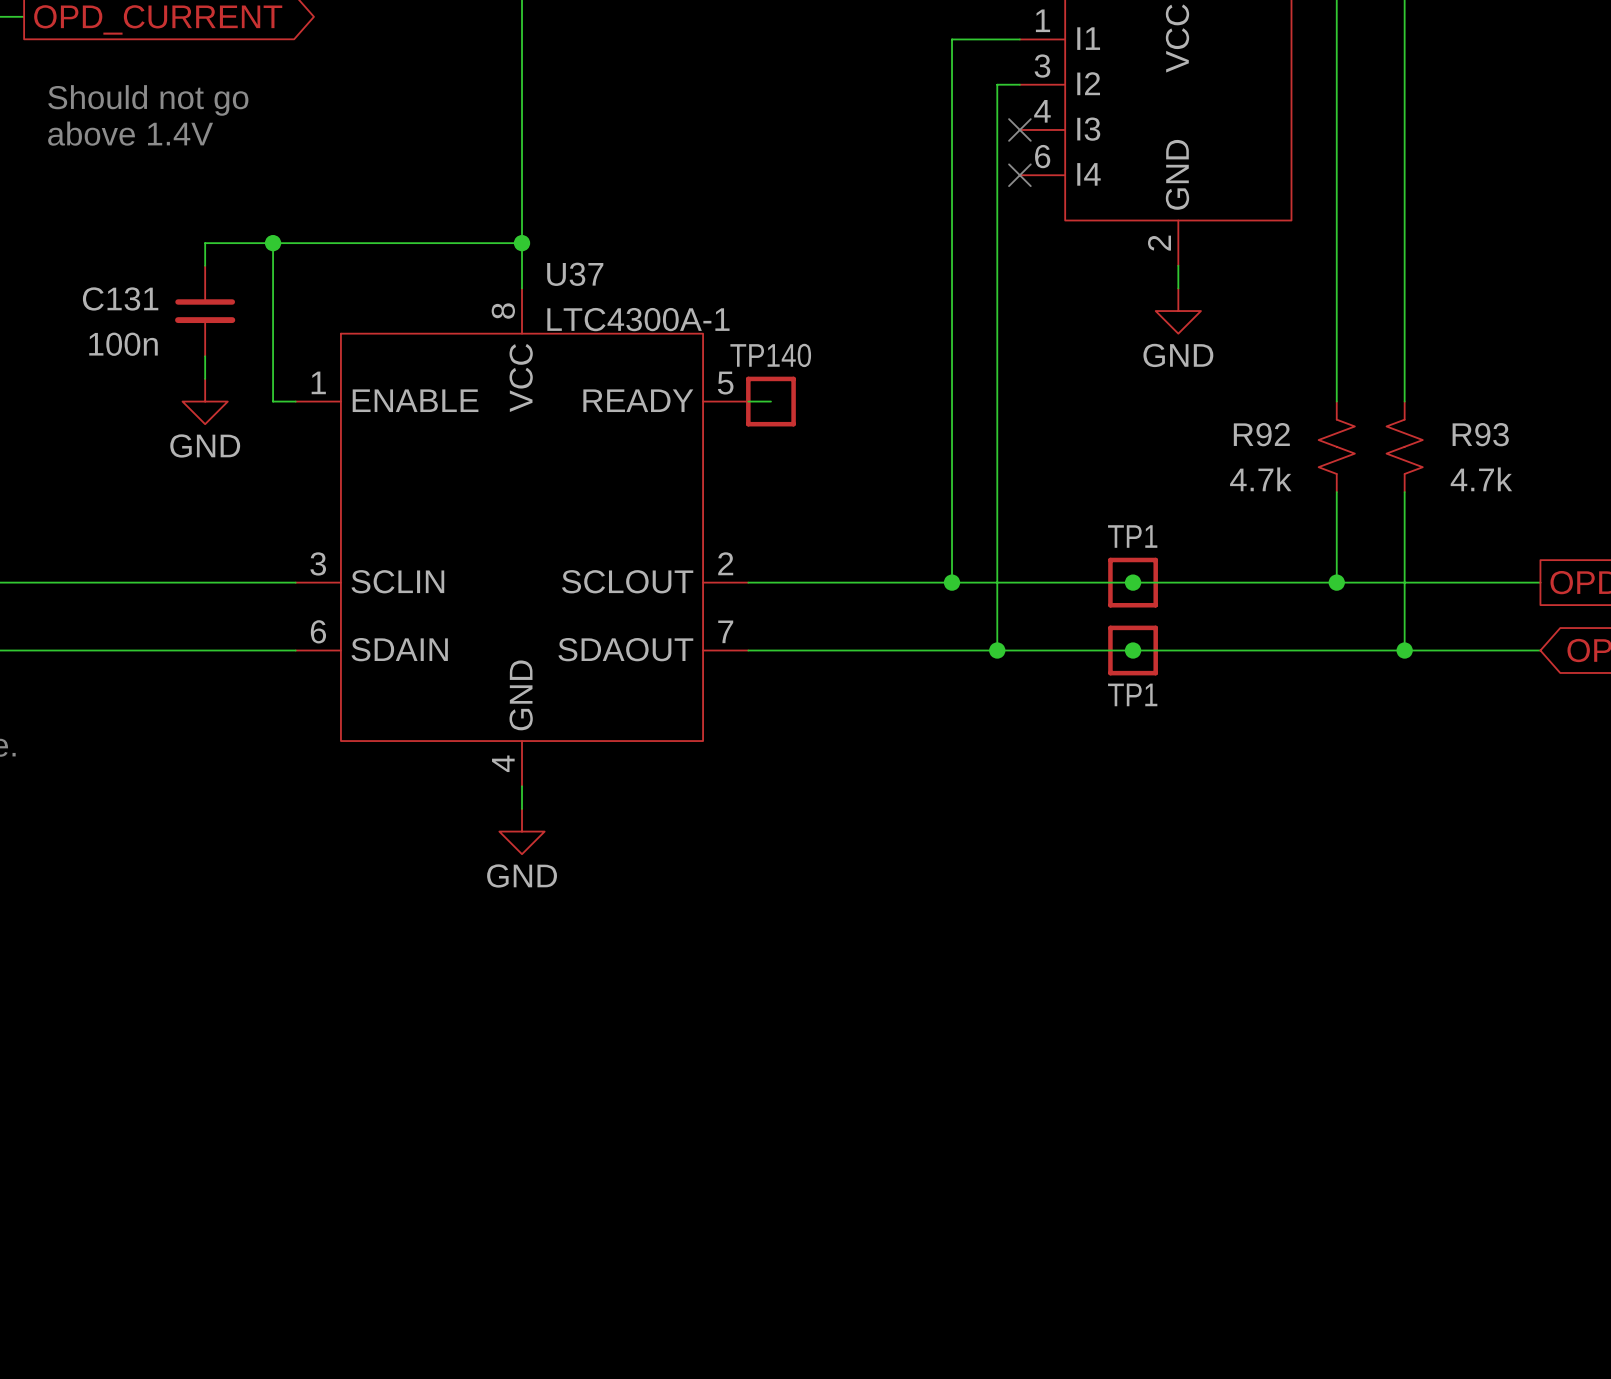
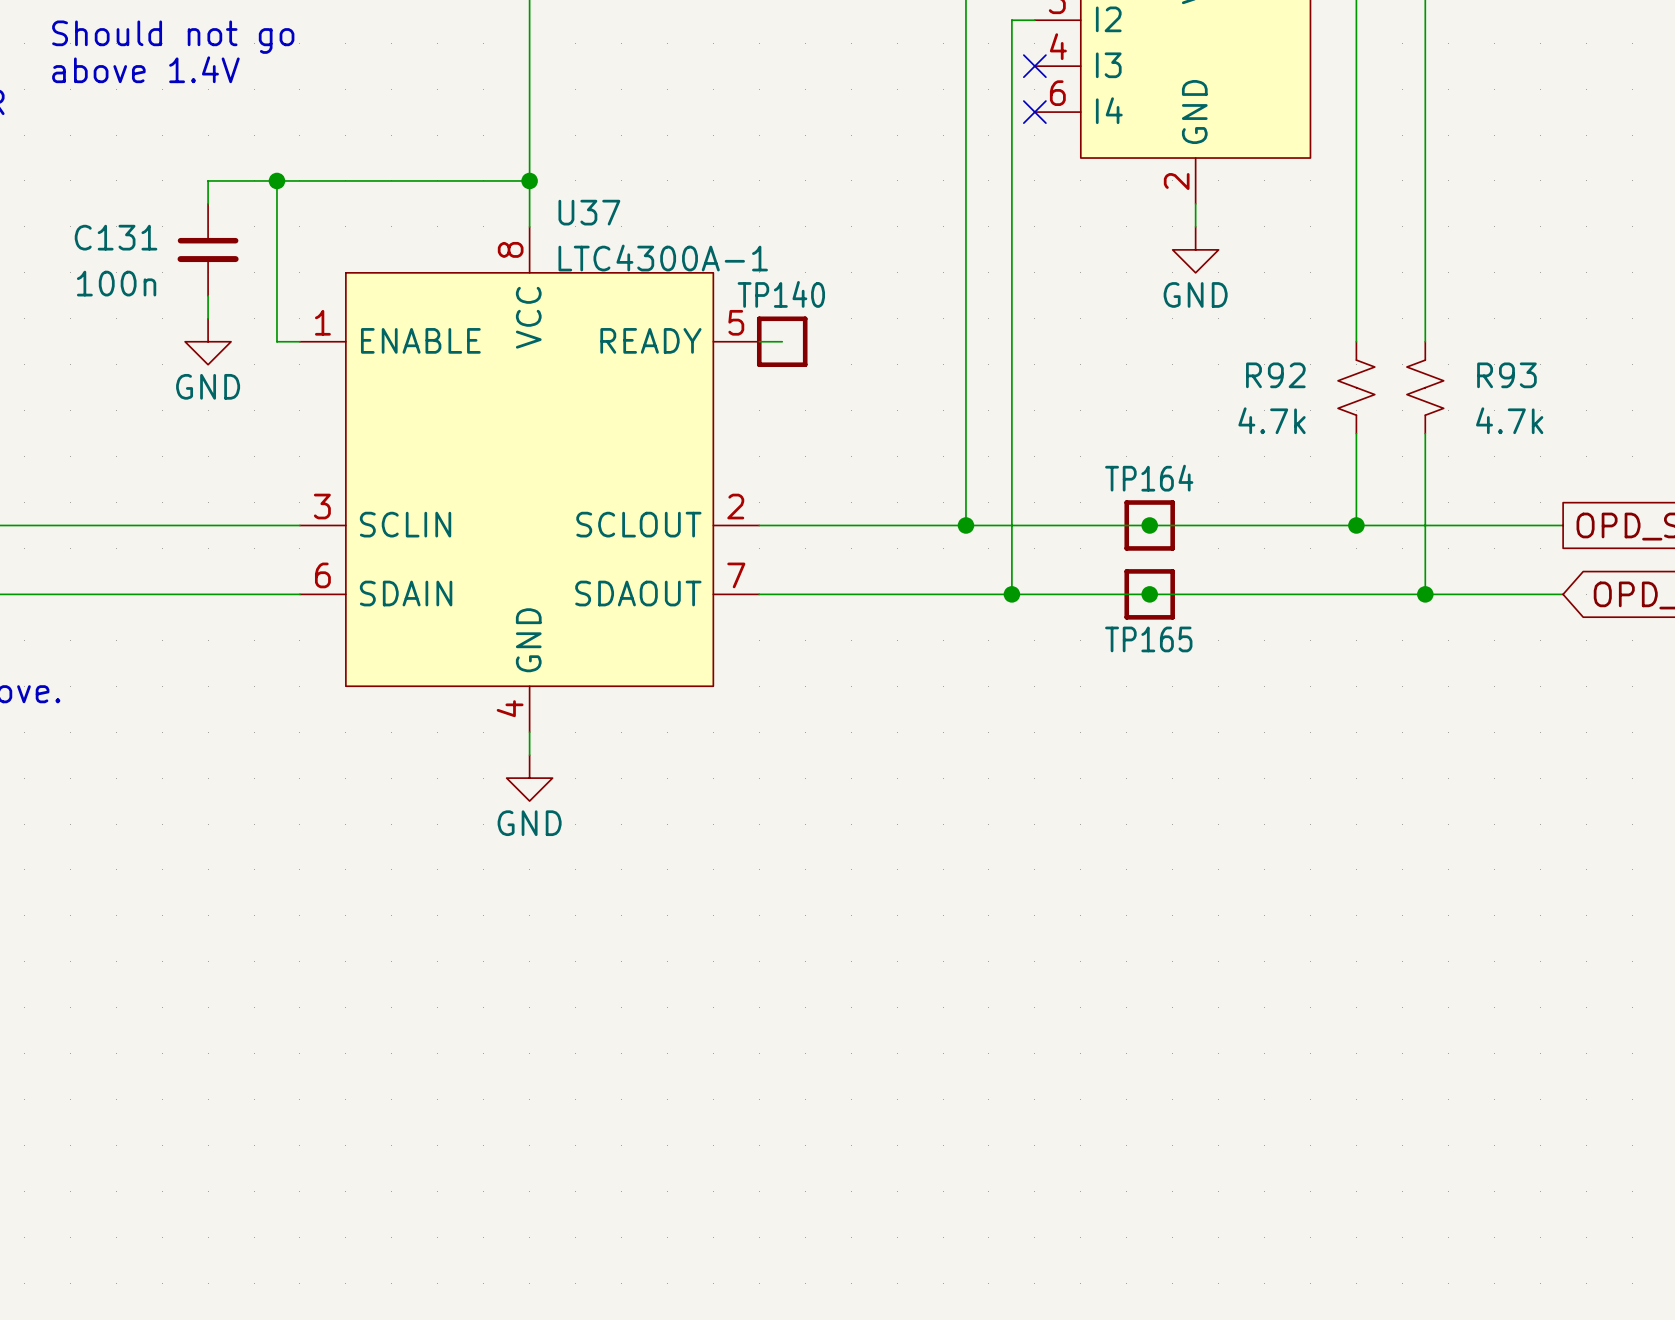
TP1 name: TP1 (1132, 536) -> TP164 (1149, 478)
TP1 name: TP1 (1132, 694) -> TP165 (1148, 639)

